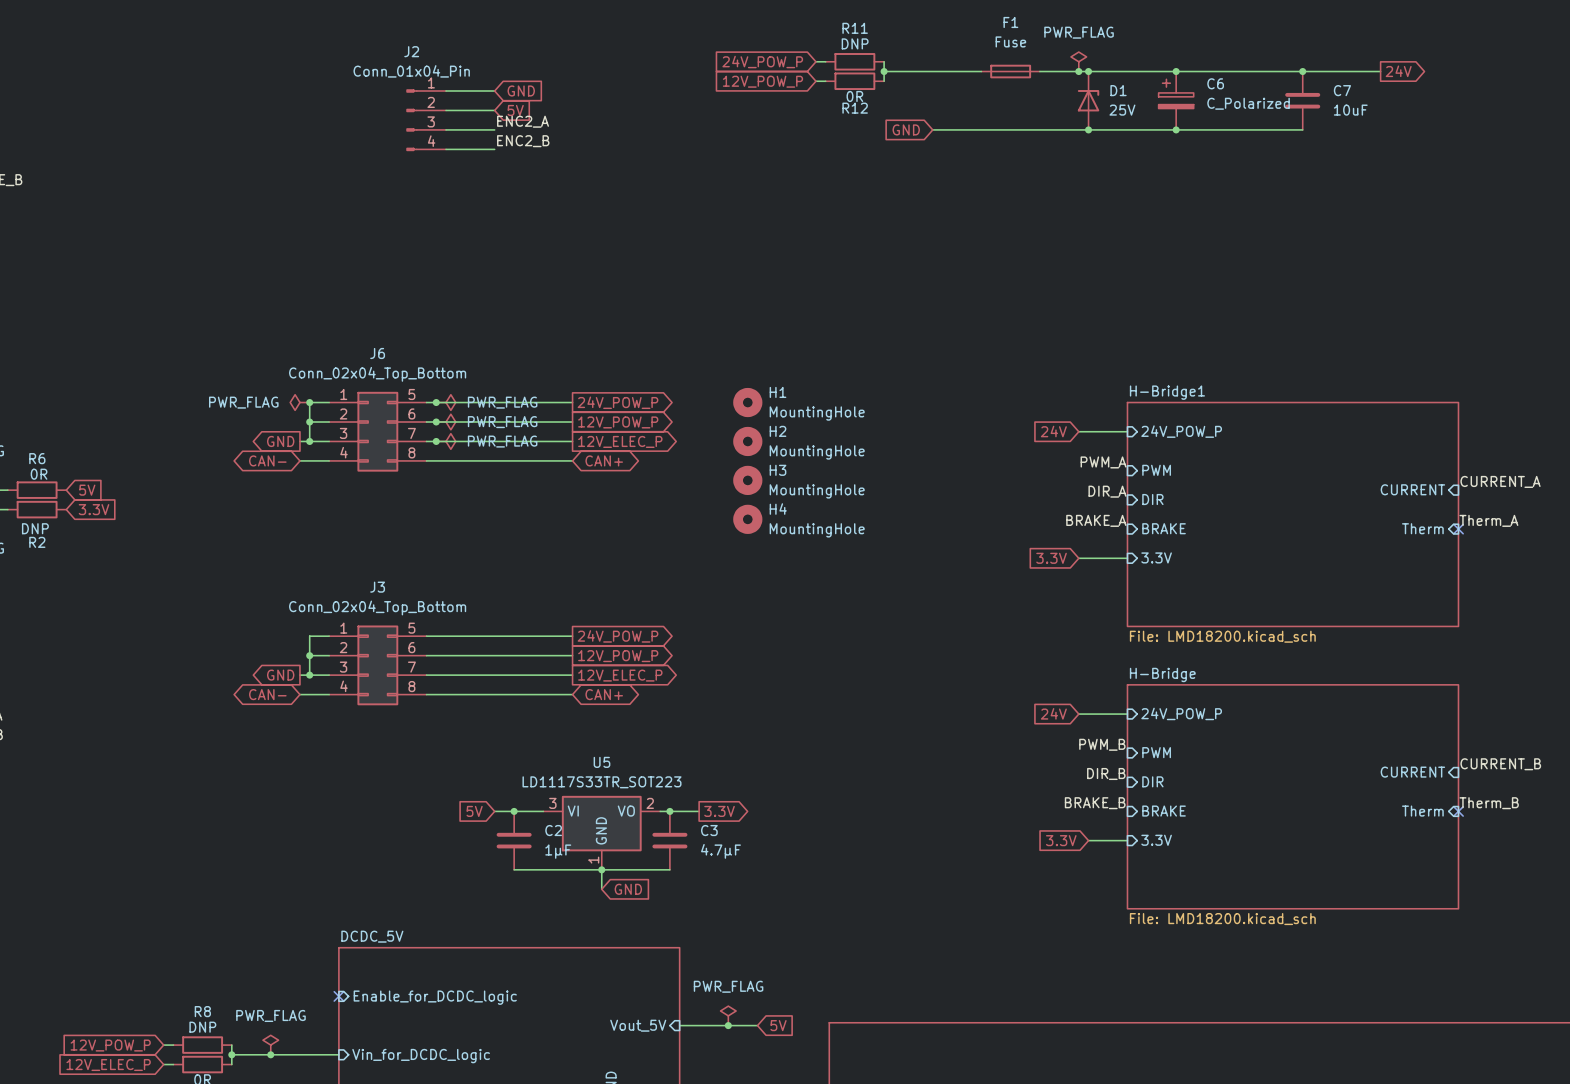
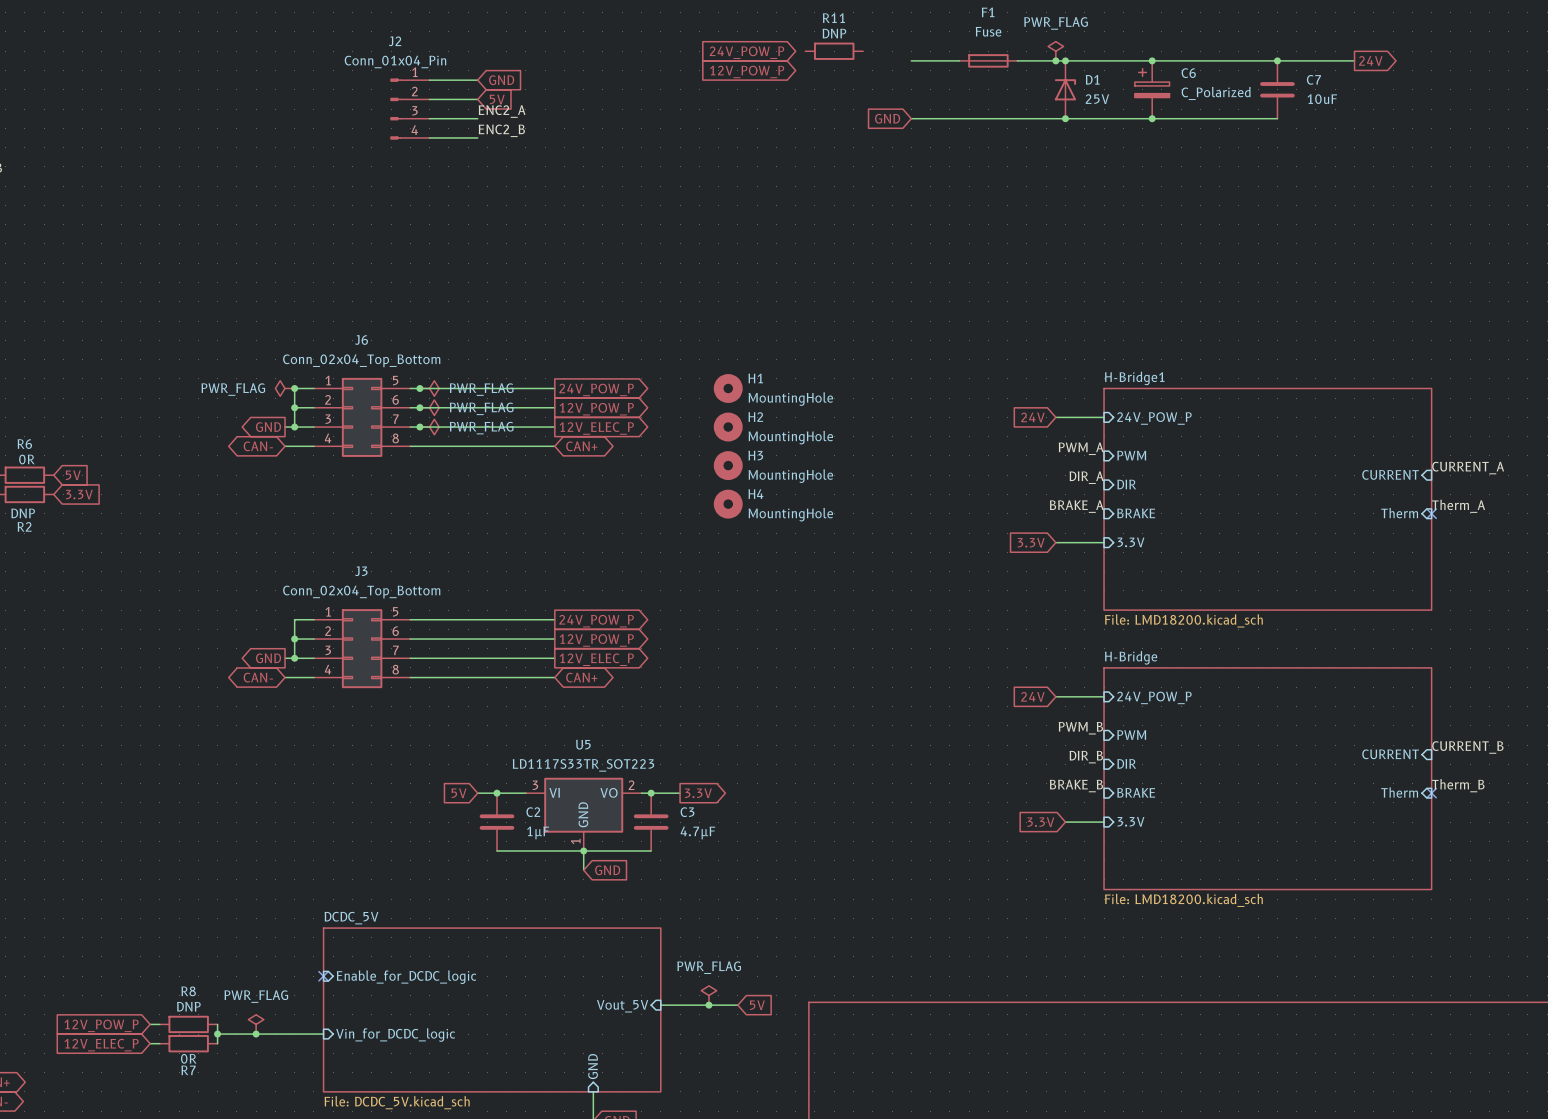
wire: (815, 61) (825, 61) -> none
wire: (884, 61) (884, 81) -> none
wire: (884, 71) (932, 71) -> none
junction: (884, 71) -> none
wire: (815, 81) (825, 81) -> none
R12: 0R (854, 81) -> none

